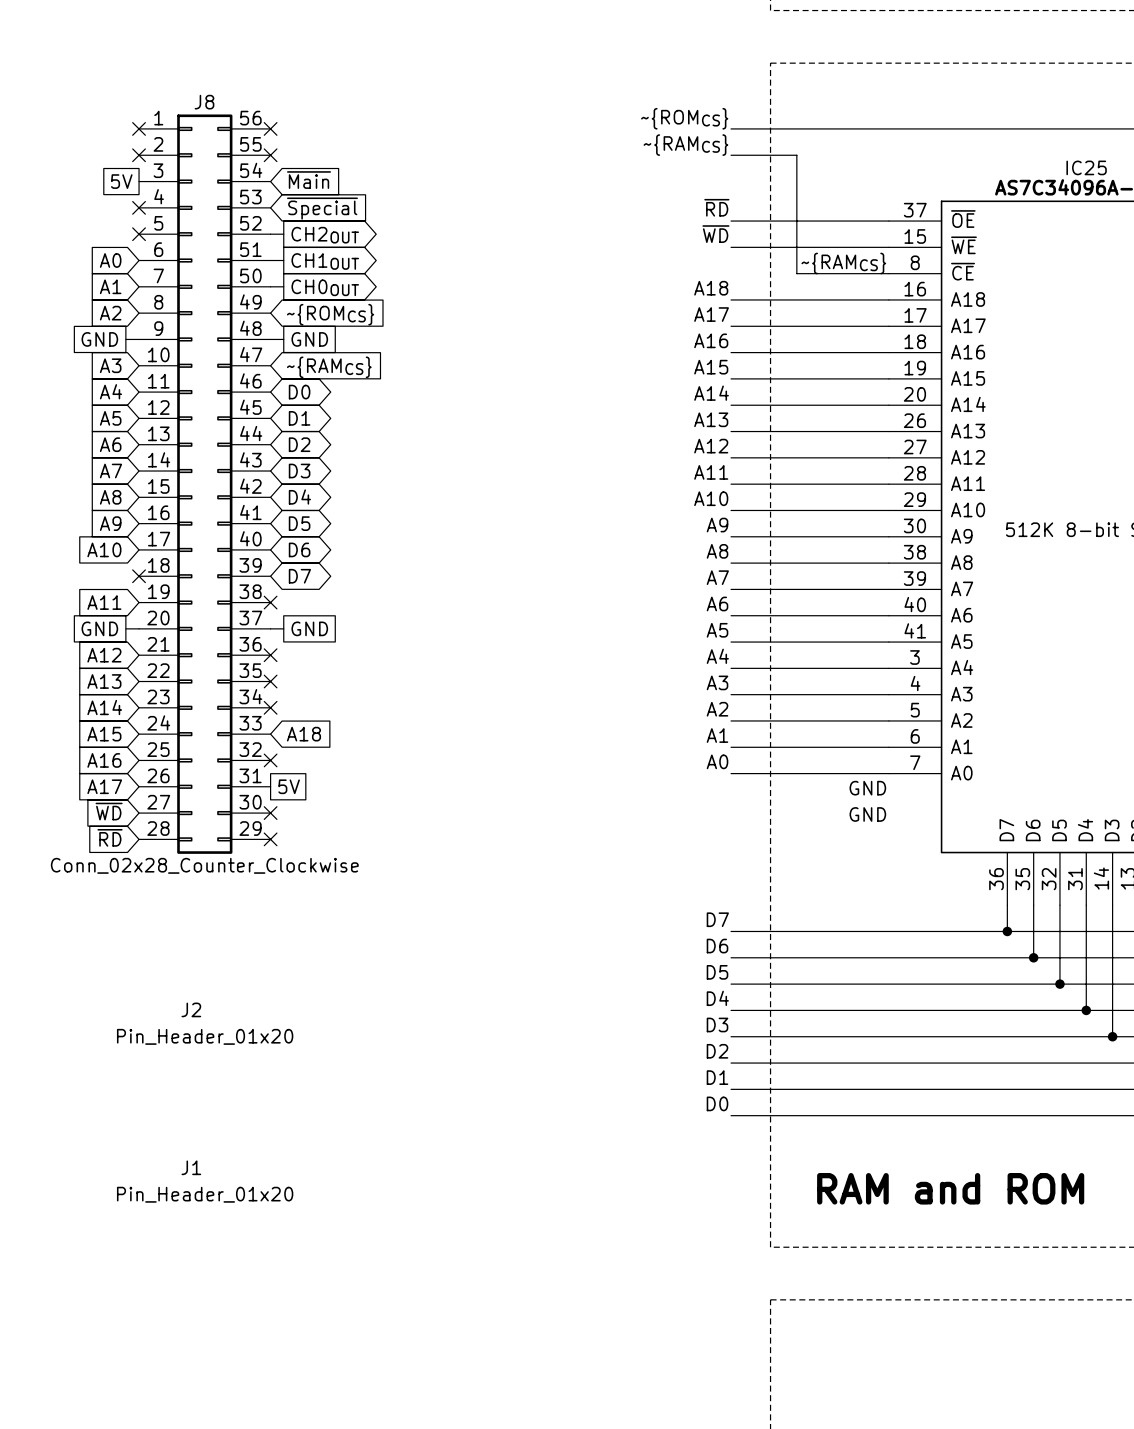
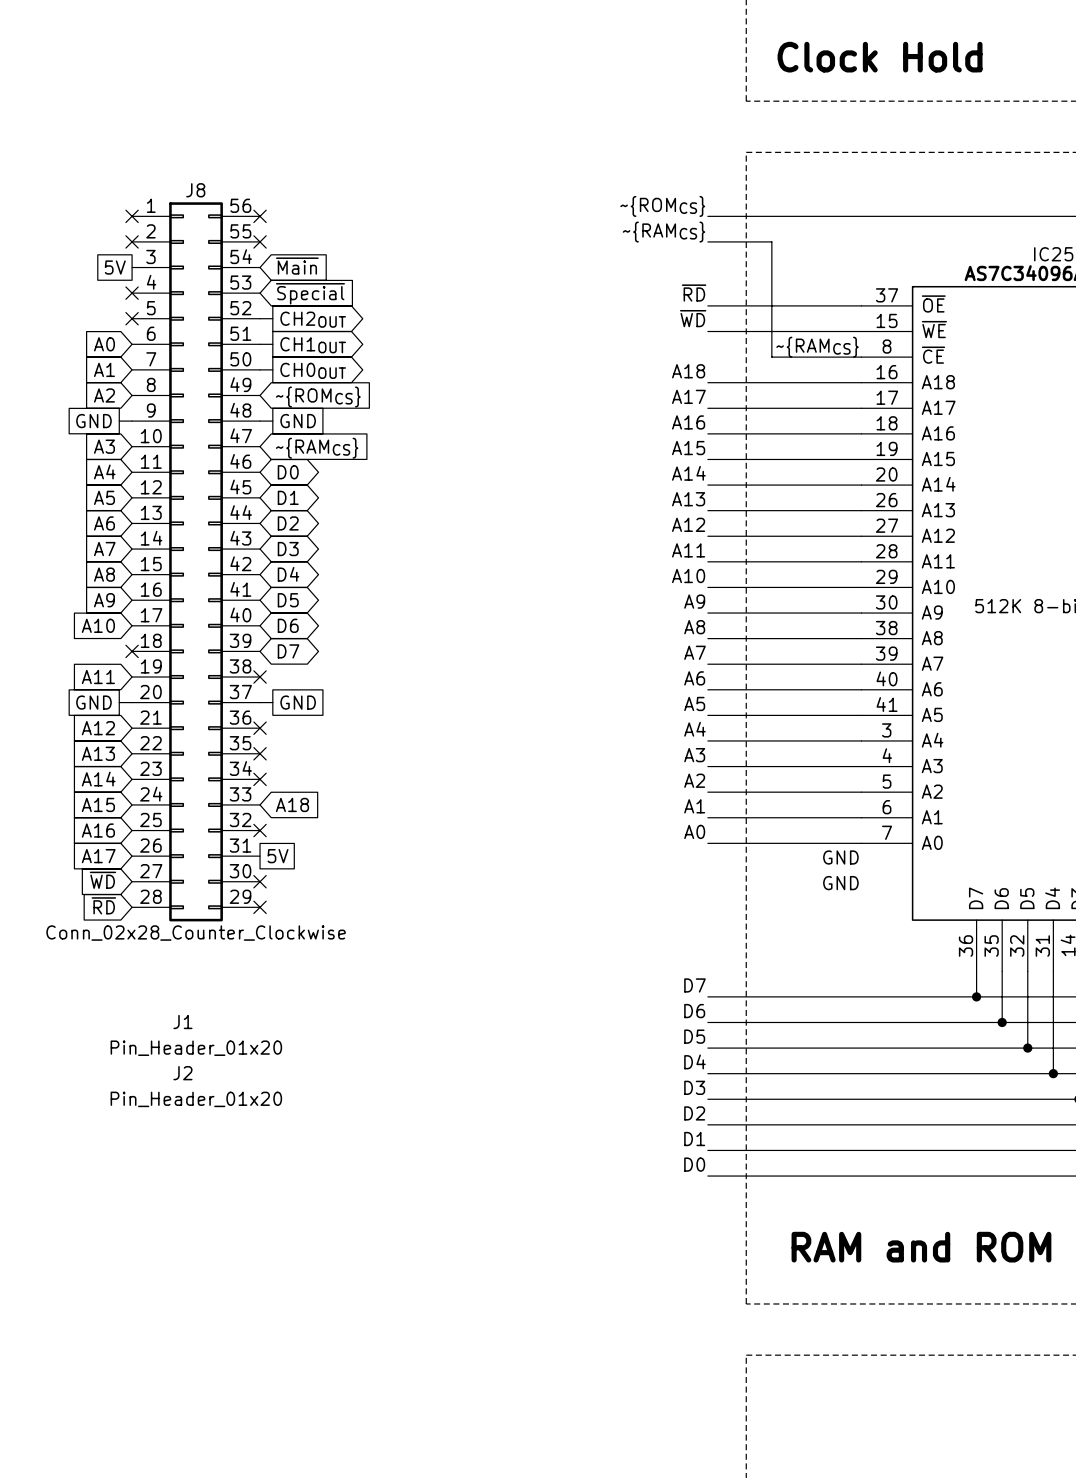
J1 position: (205, 1181) -> (196, 1035)

